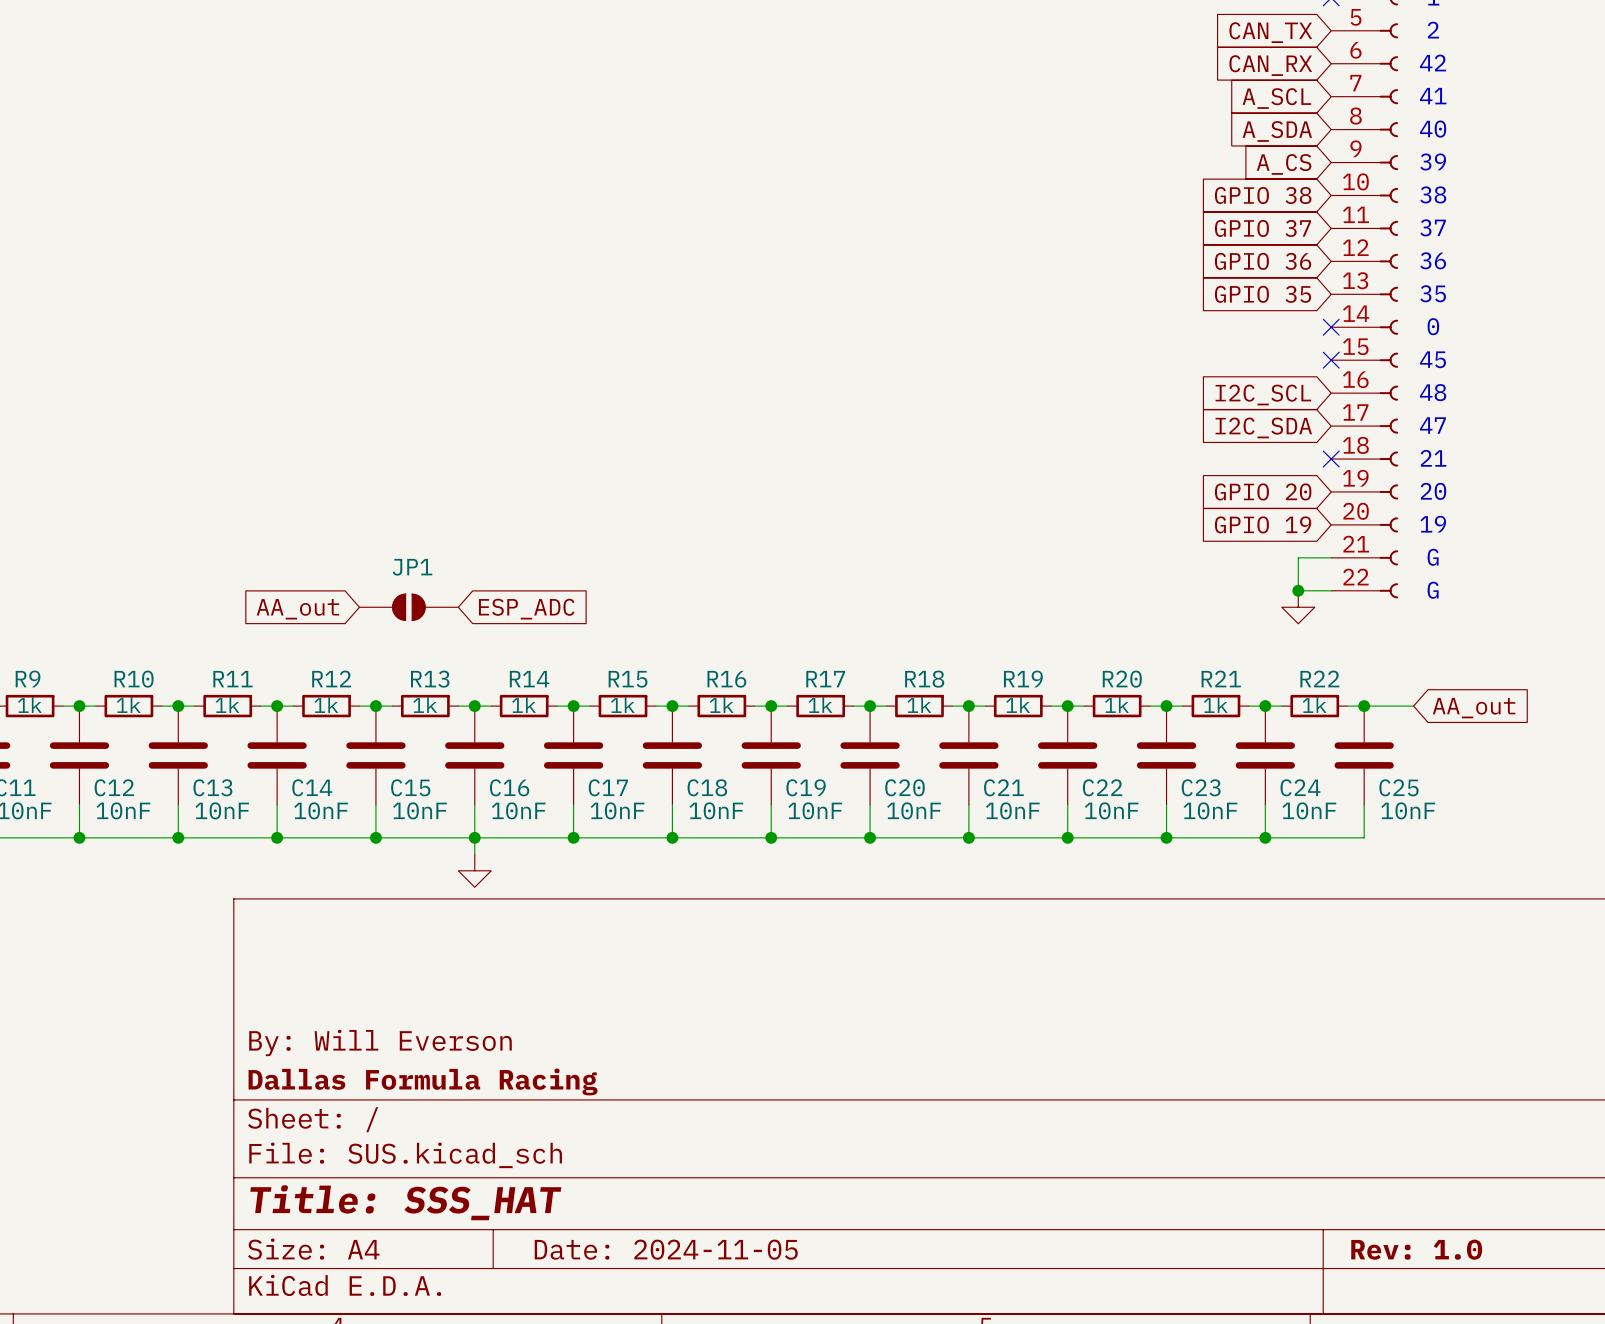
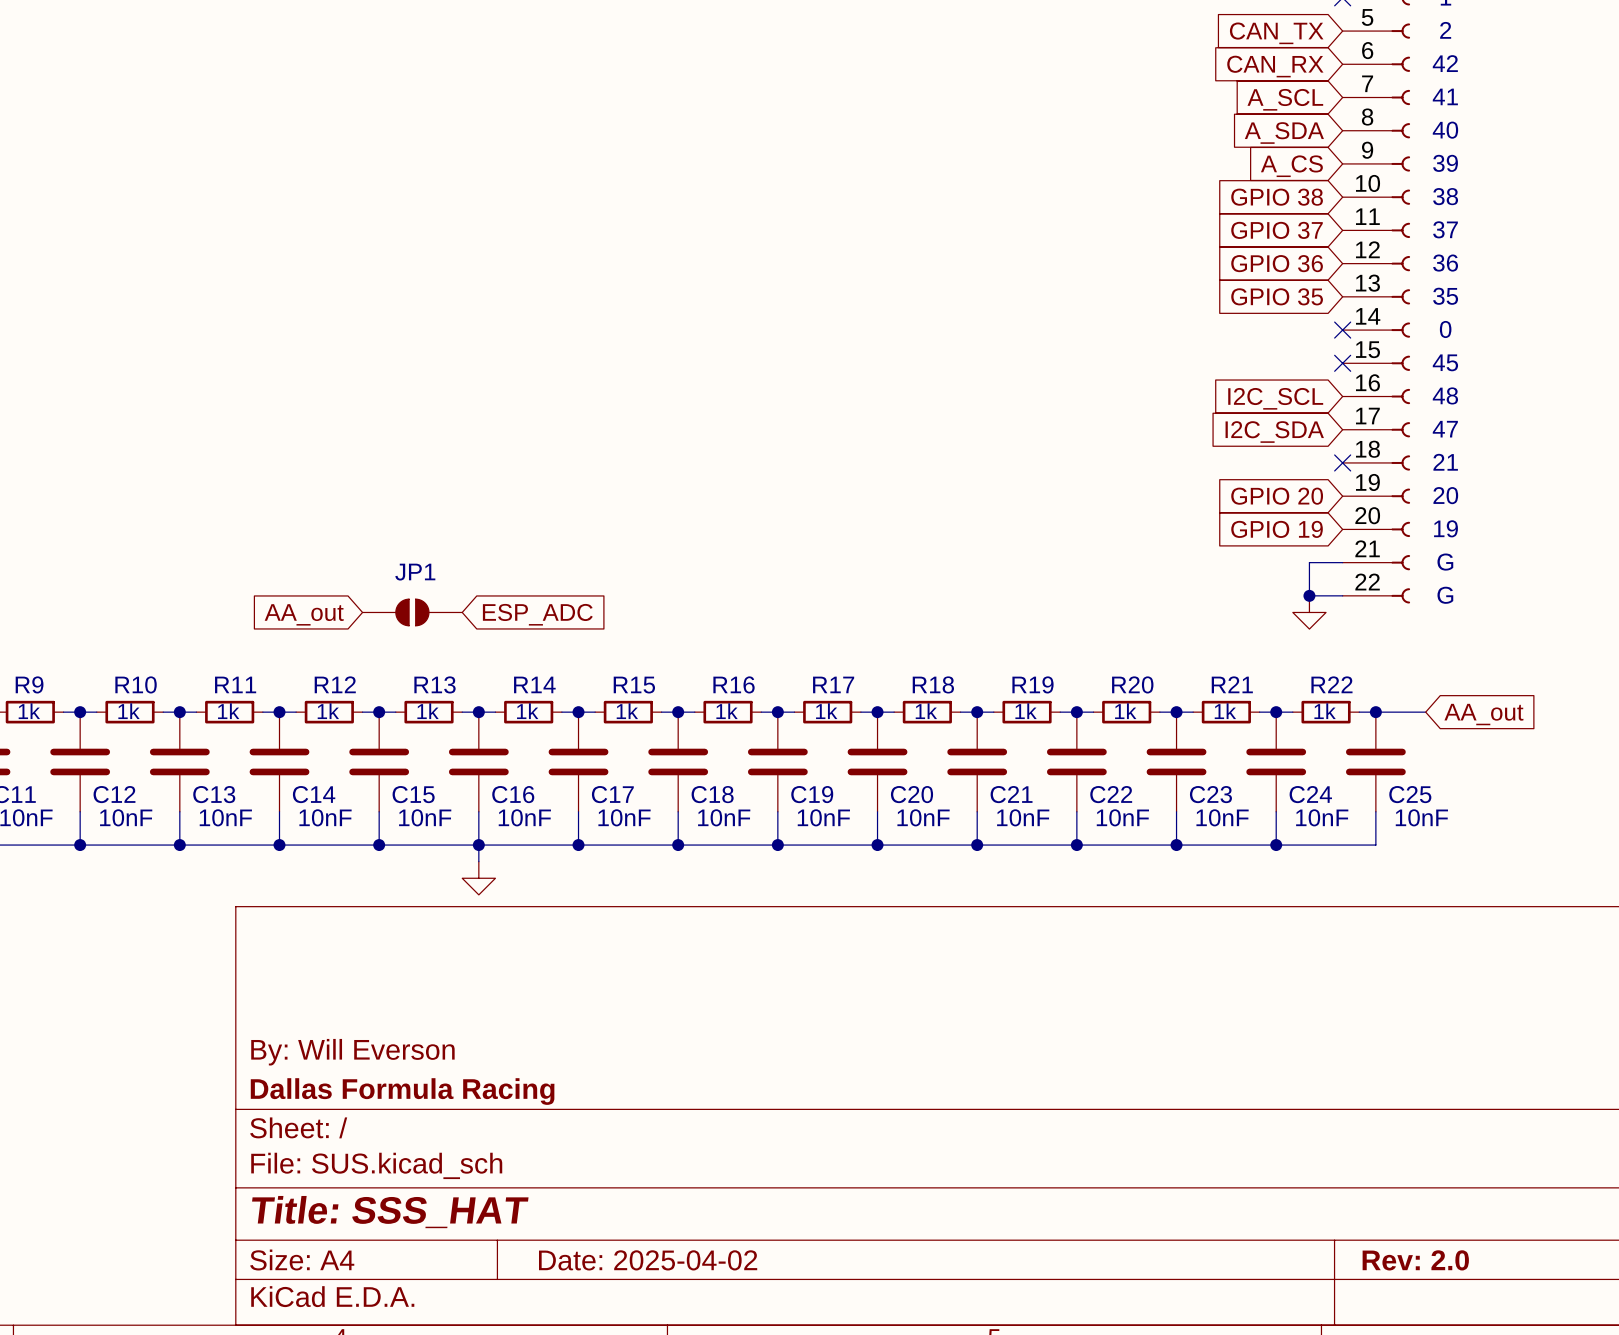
title block: Date: 2024-11-05 (666, 1249) -> Date: 2025-04-02 (648, 1260)
title block: Rev: 1.0 (1416, 1249) -> Rev: 2.0 (1415, 1260)

